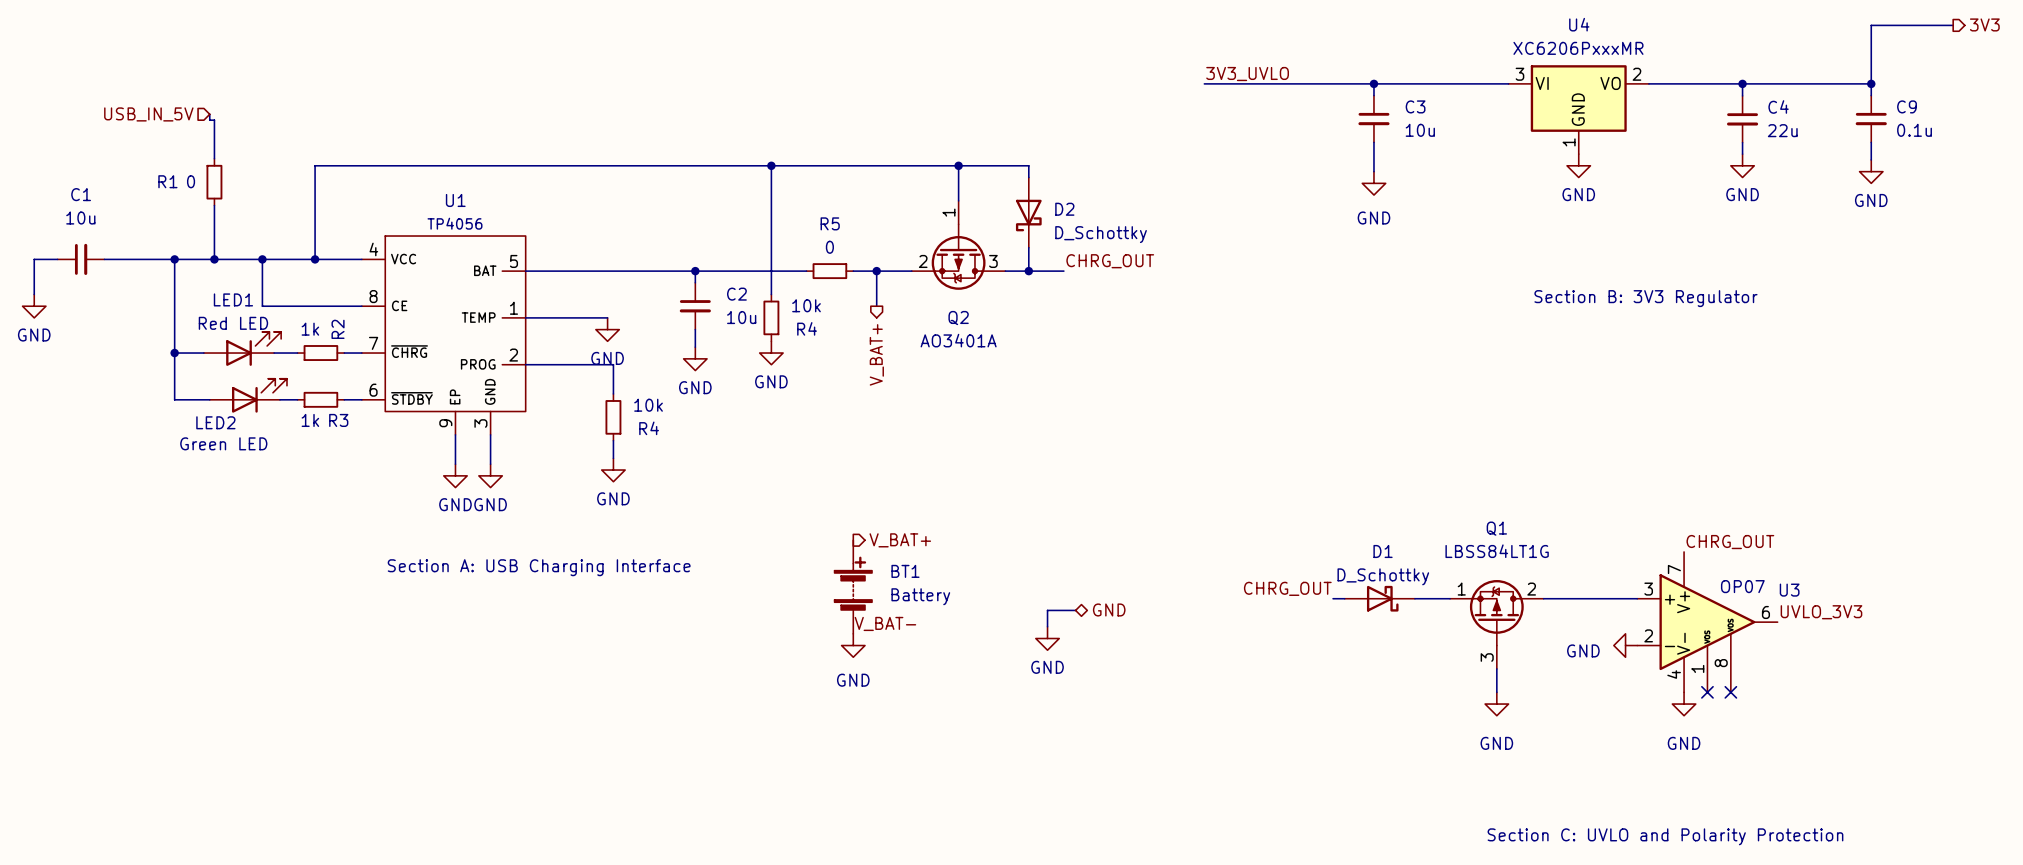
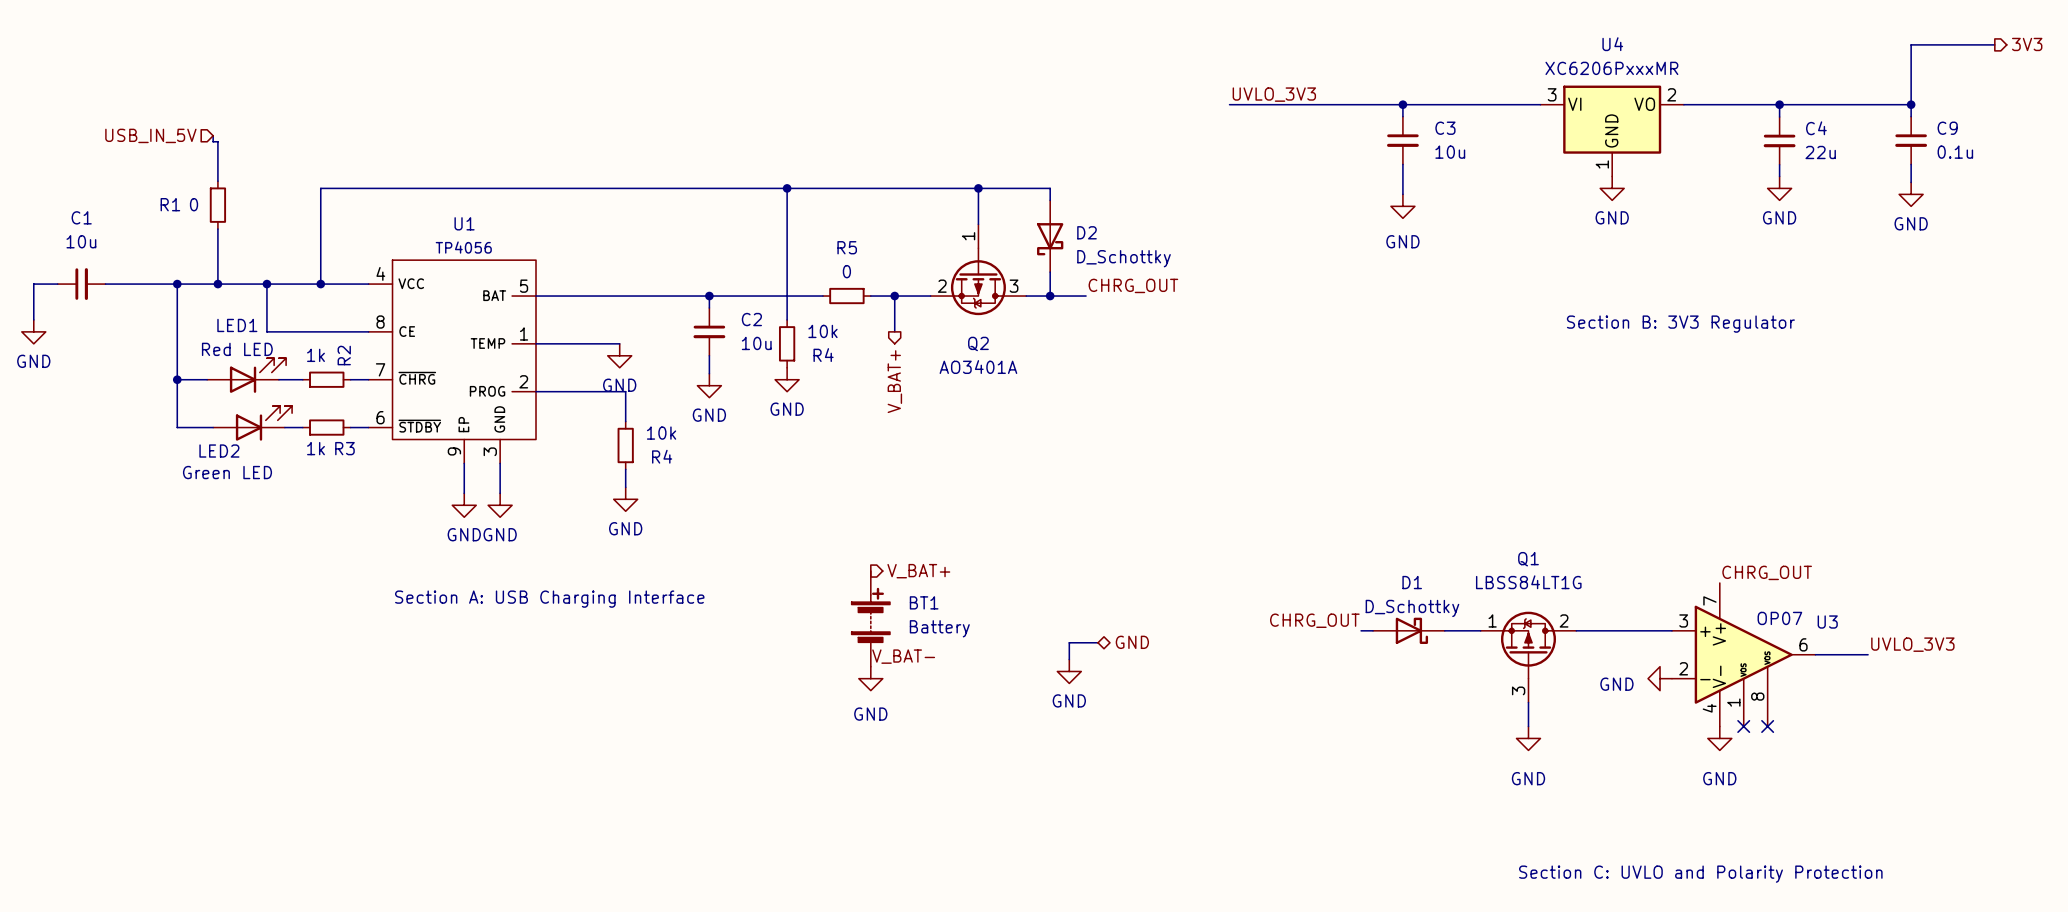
label: 3V3_UVLO (1247, 74) -> UVLO_3V3 (1274, 94)
label position: UVLO_3V3 (1821, 612) -> UVLO_3V3 (1912, 644)
wire: none -> (1815, 654) (1868, 654)

